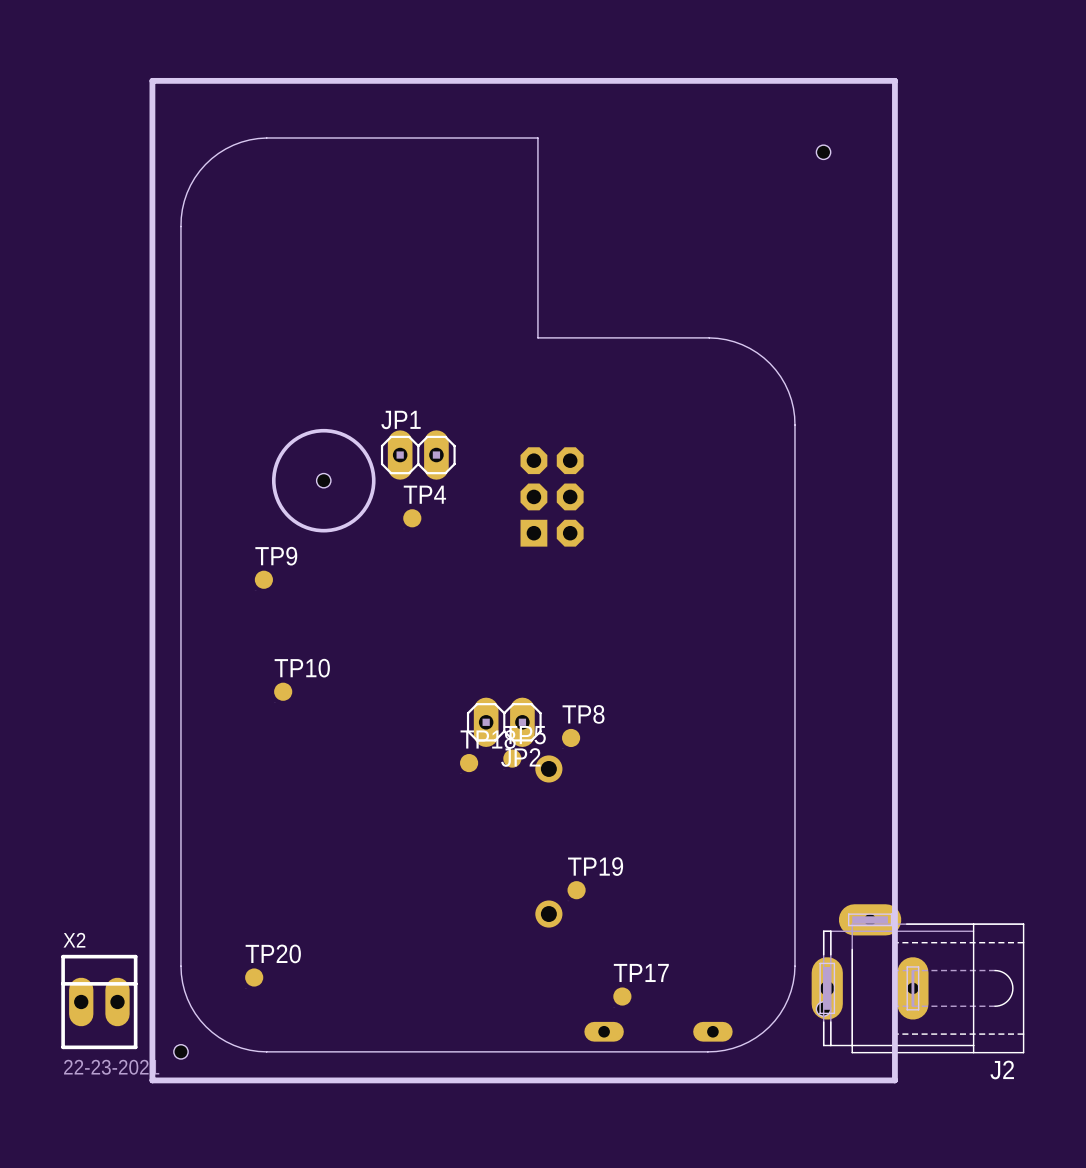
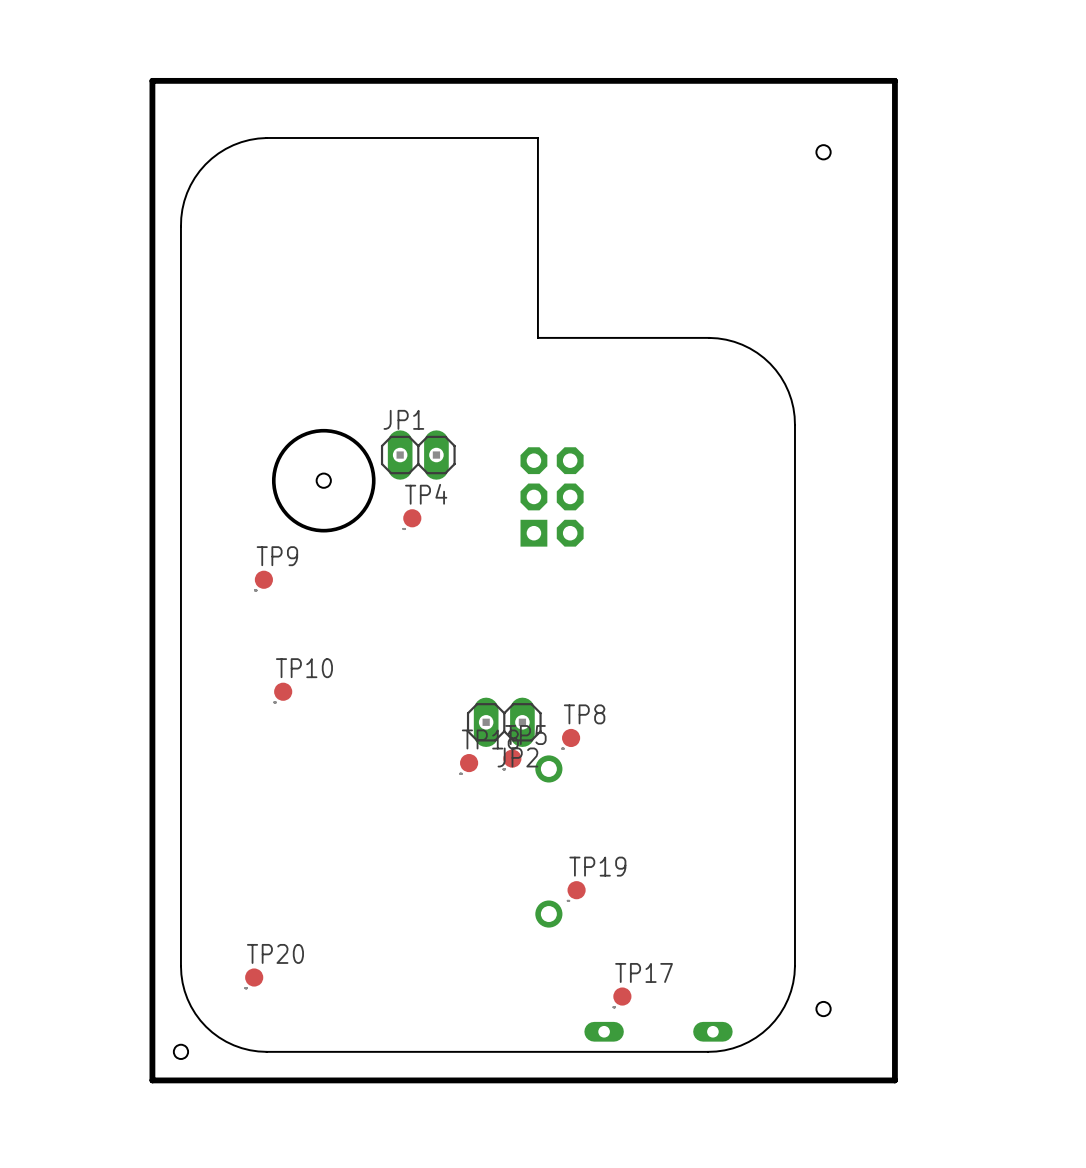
J2: (917, 978) -> none
X2: 22-23-2021 (99, 1001) -> none

